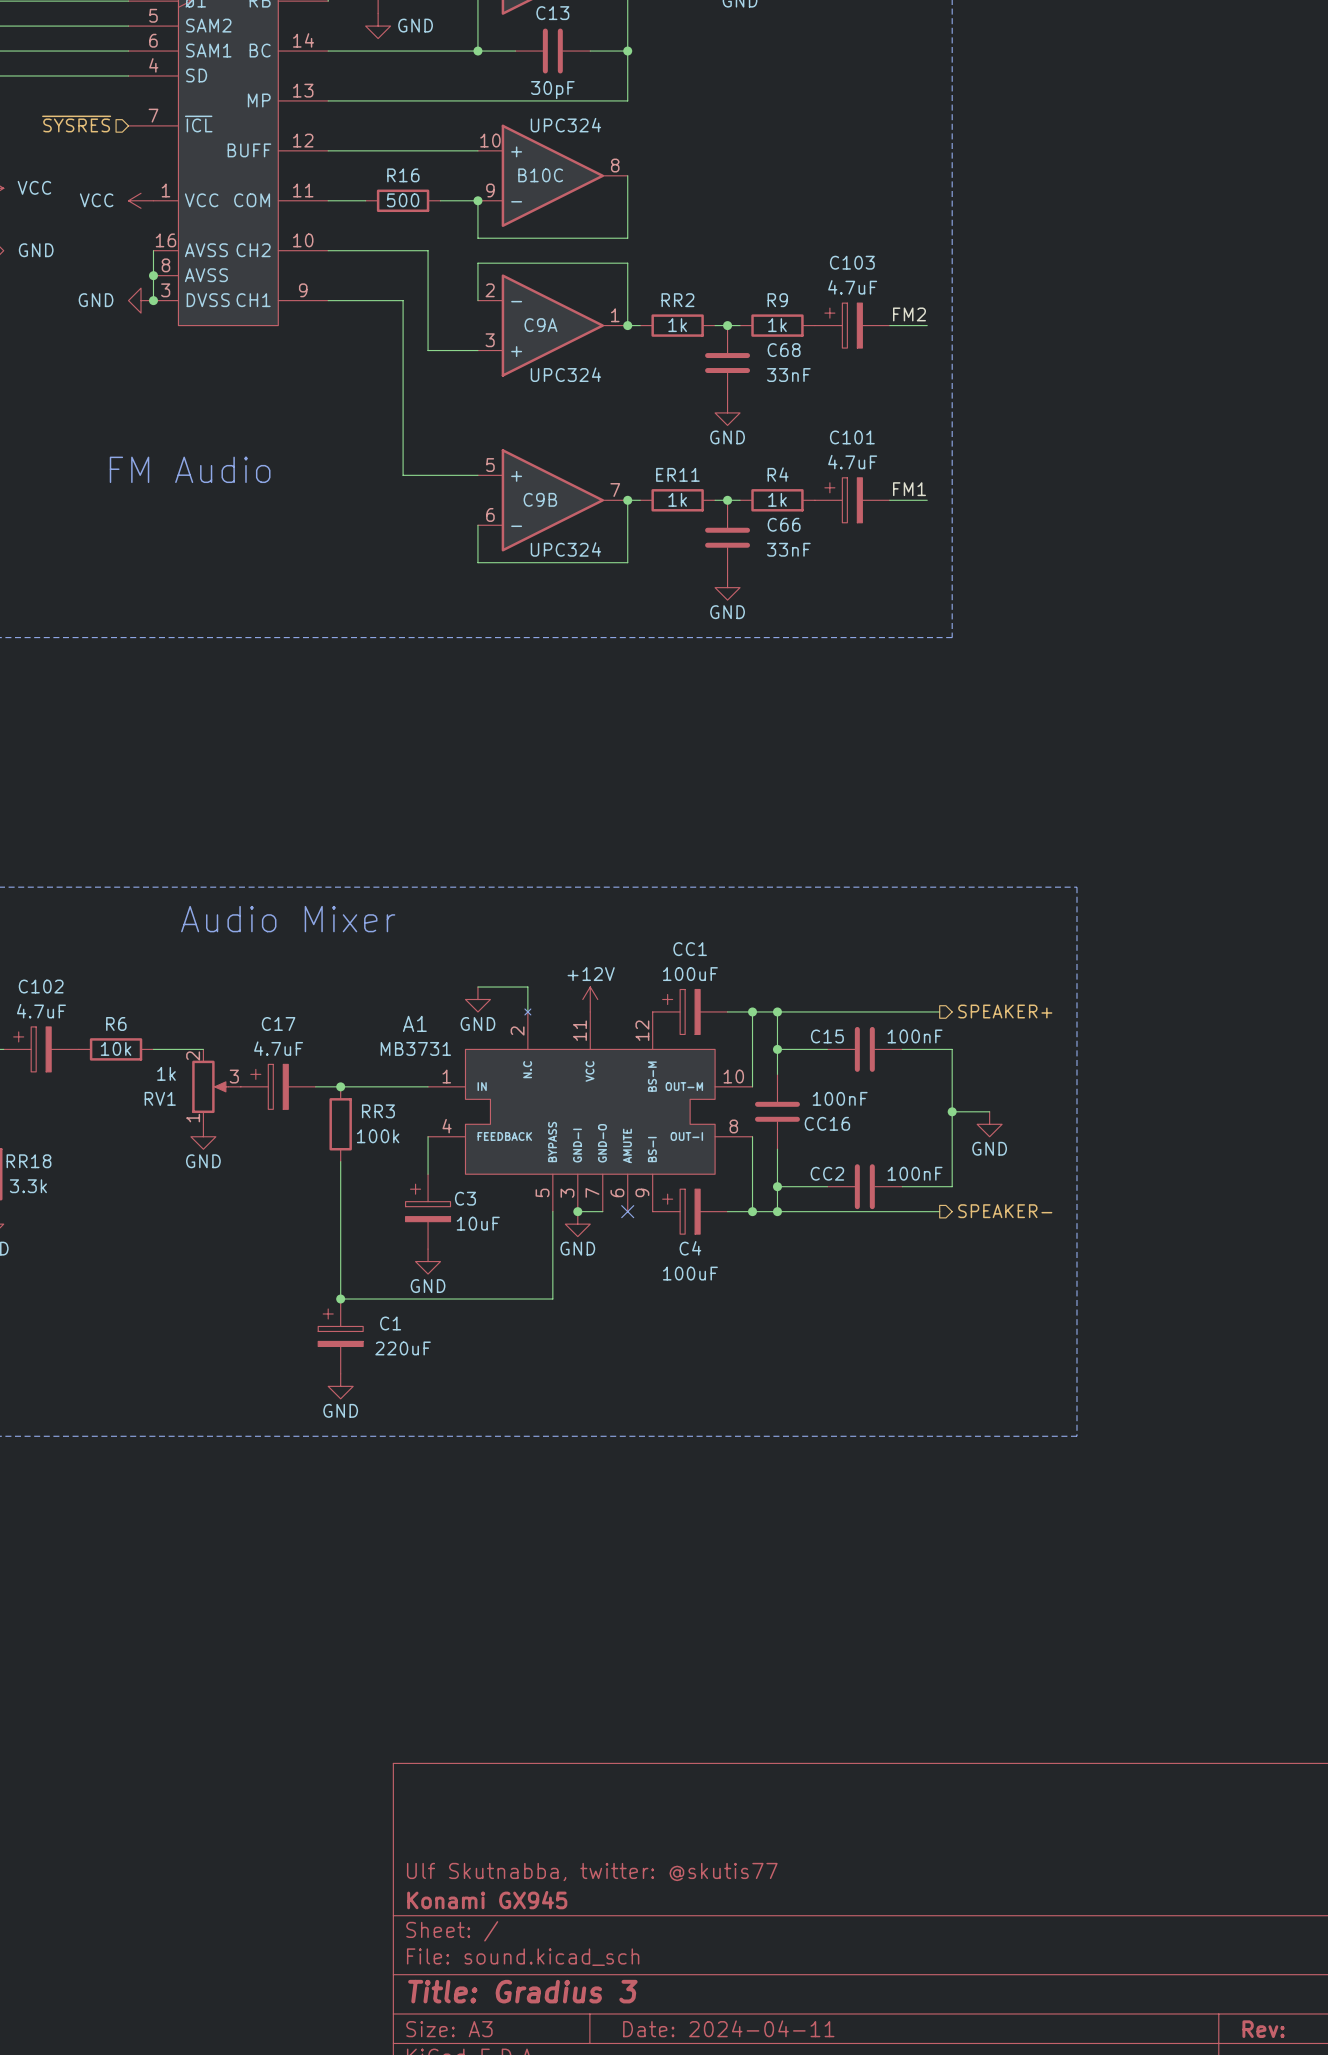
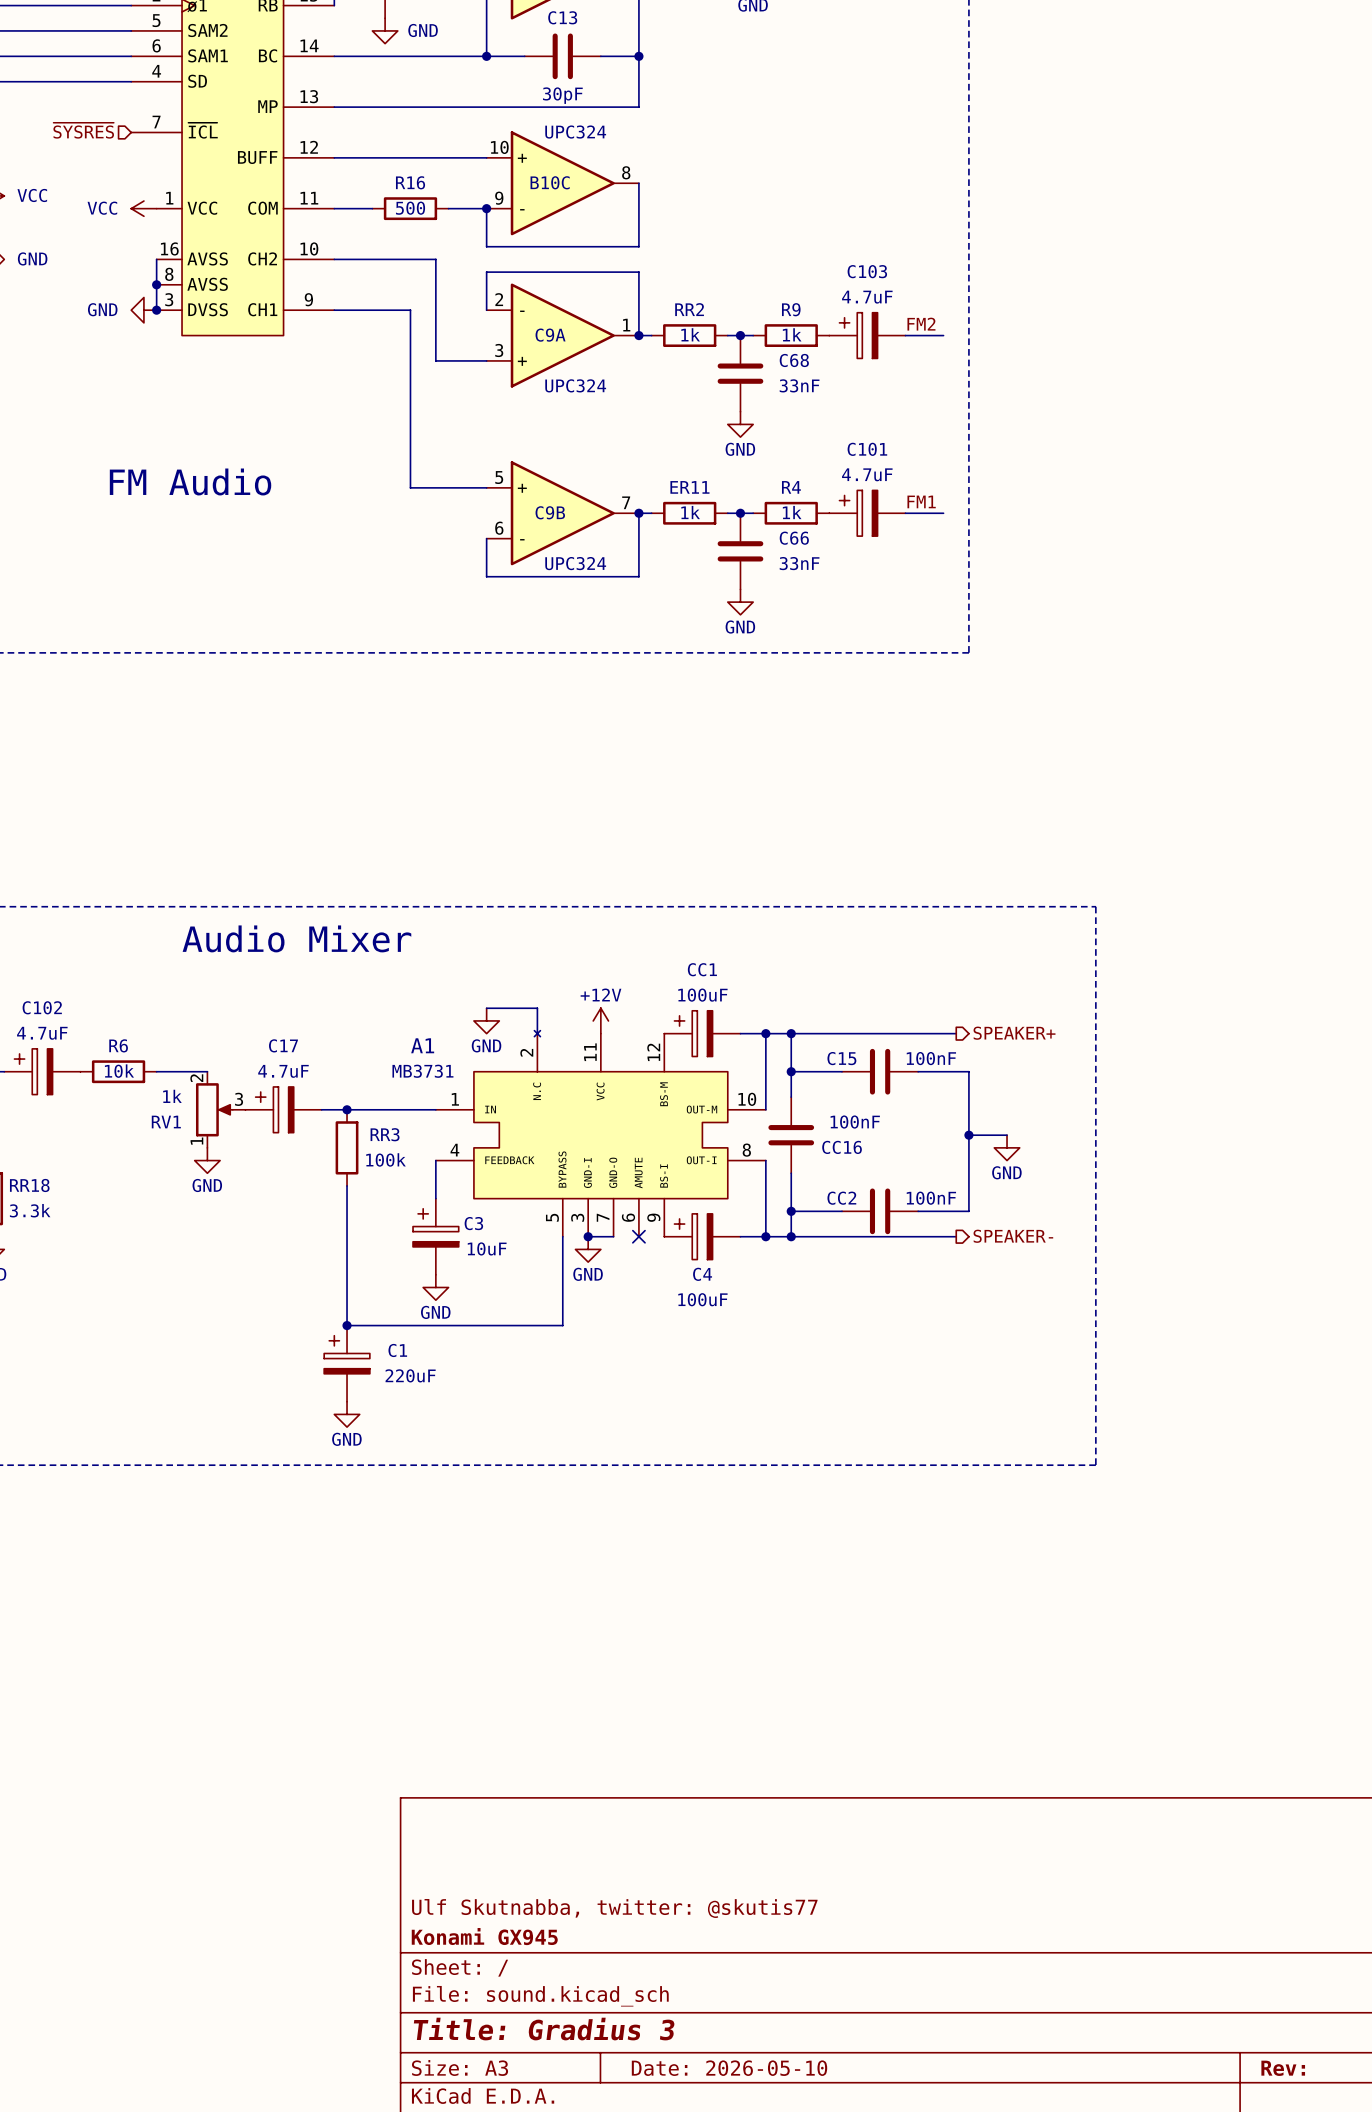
title block: Date: 2024-04-11 (728, 2028) -> Date: 2026-05-10 (729, 2068)

